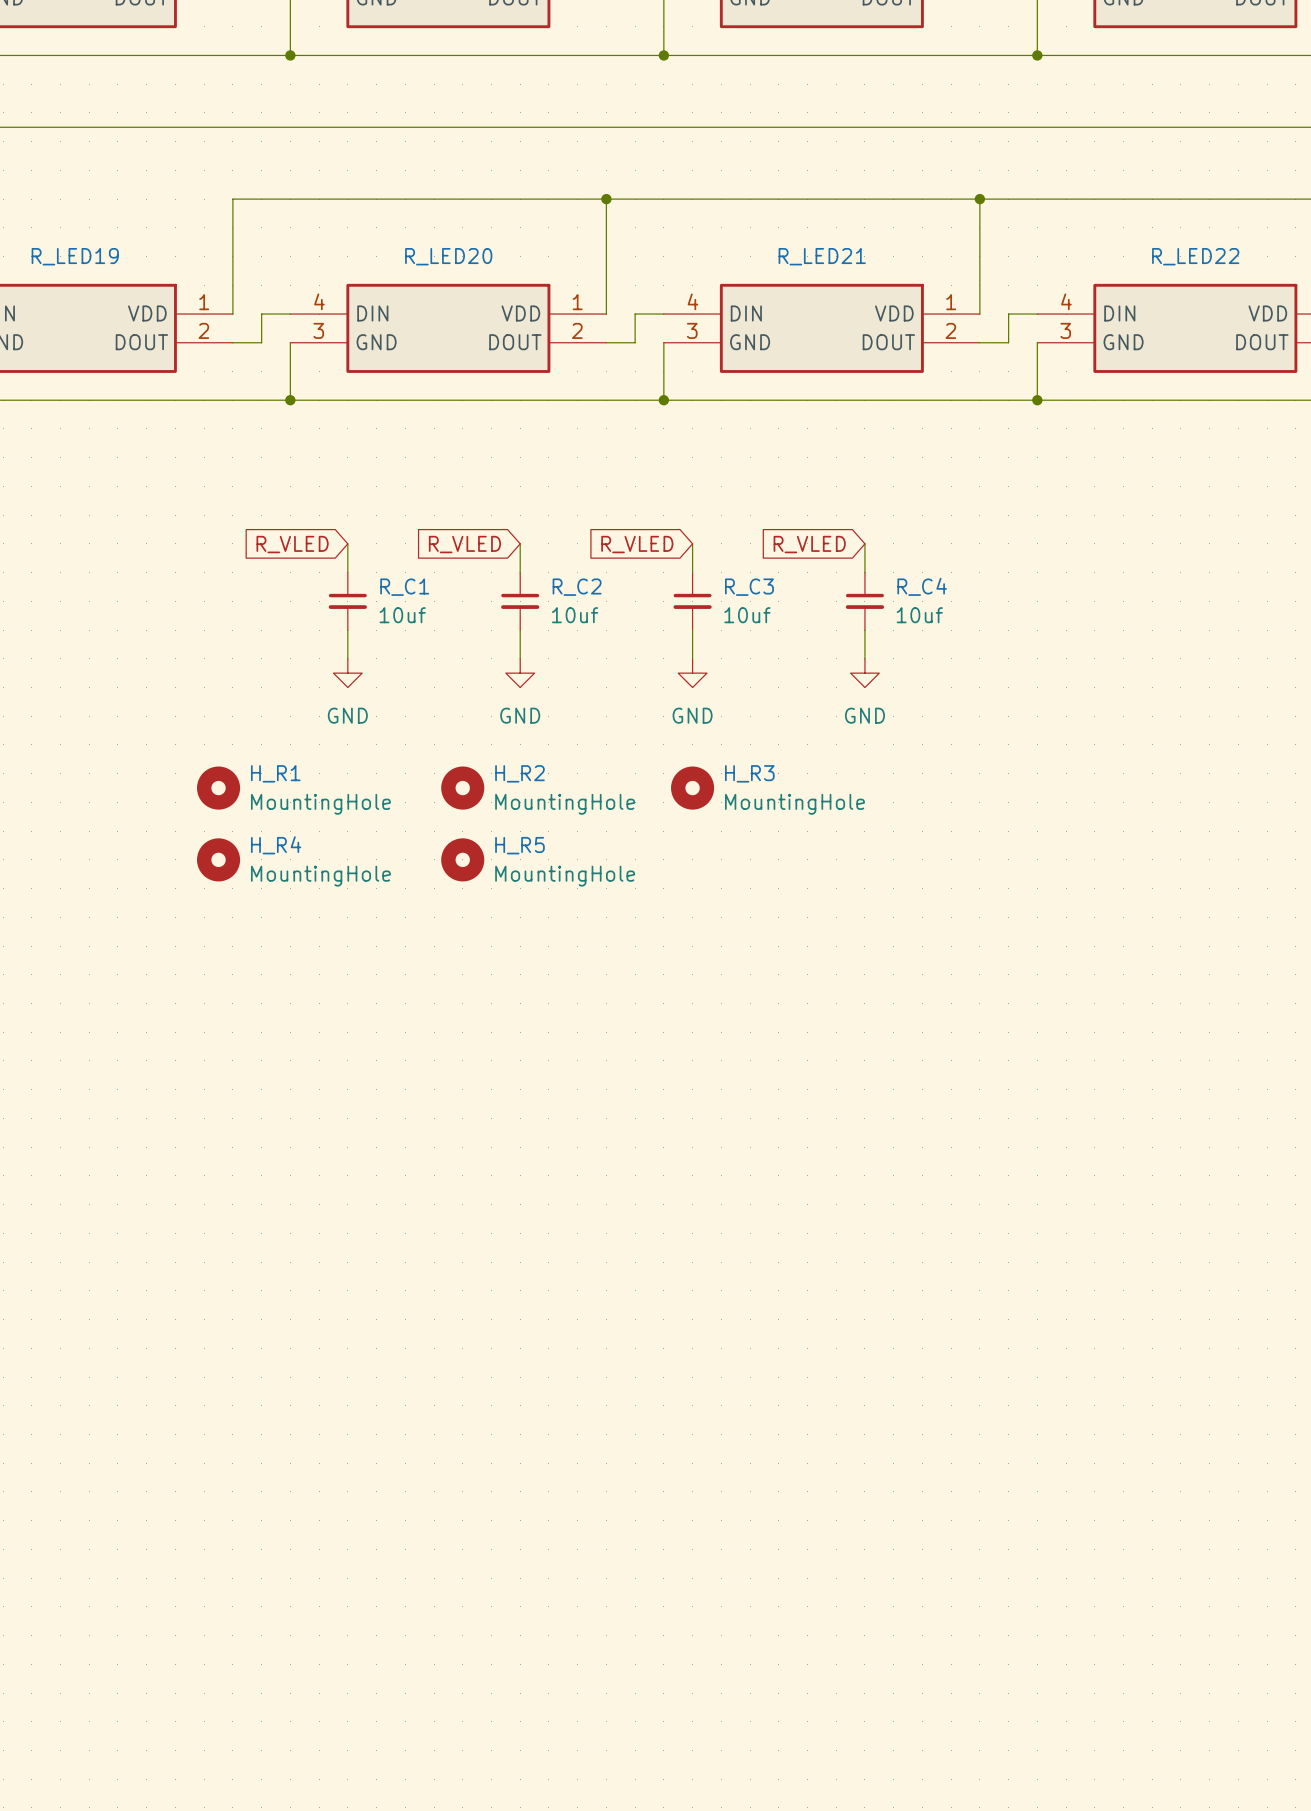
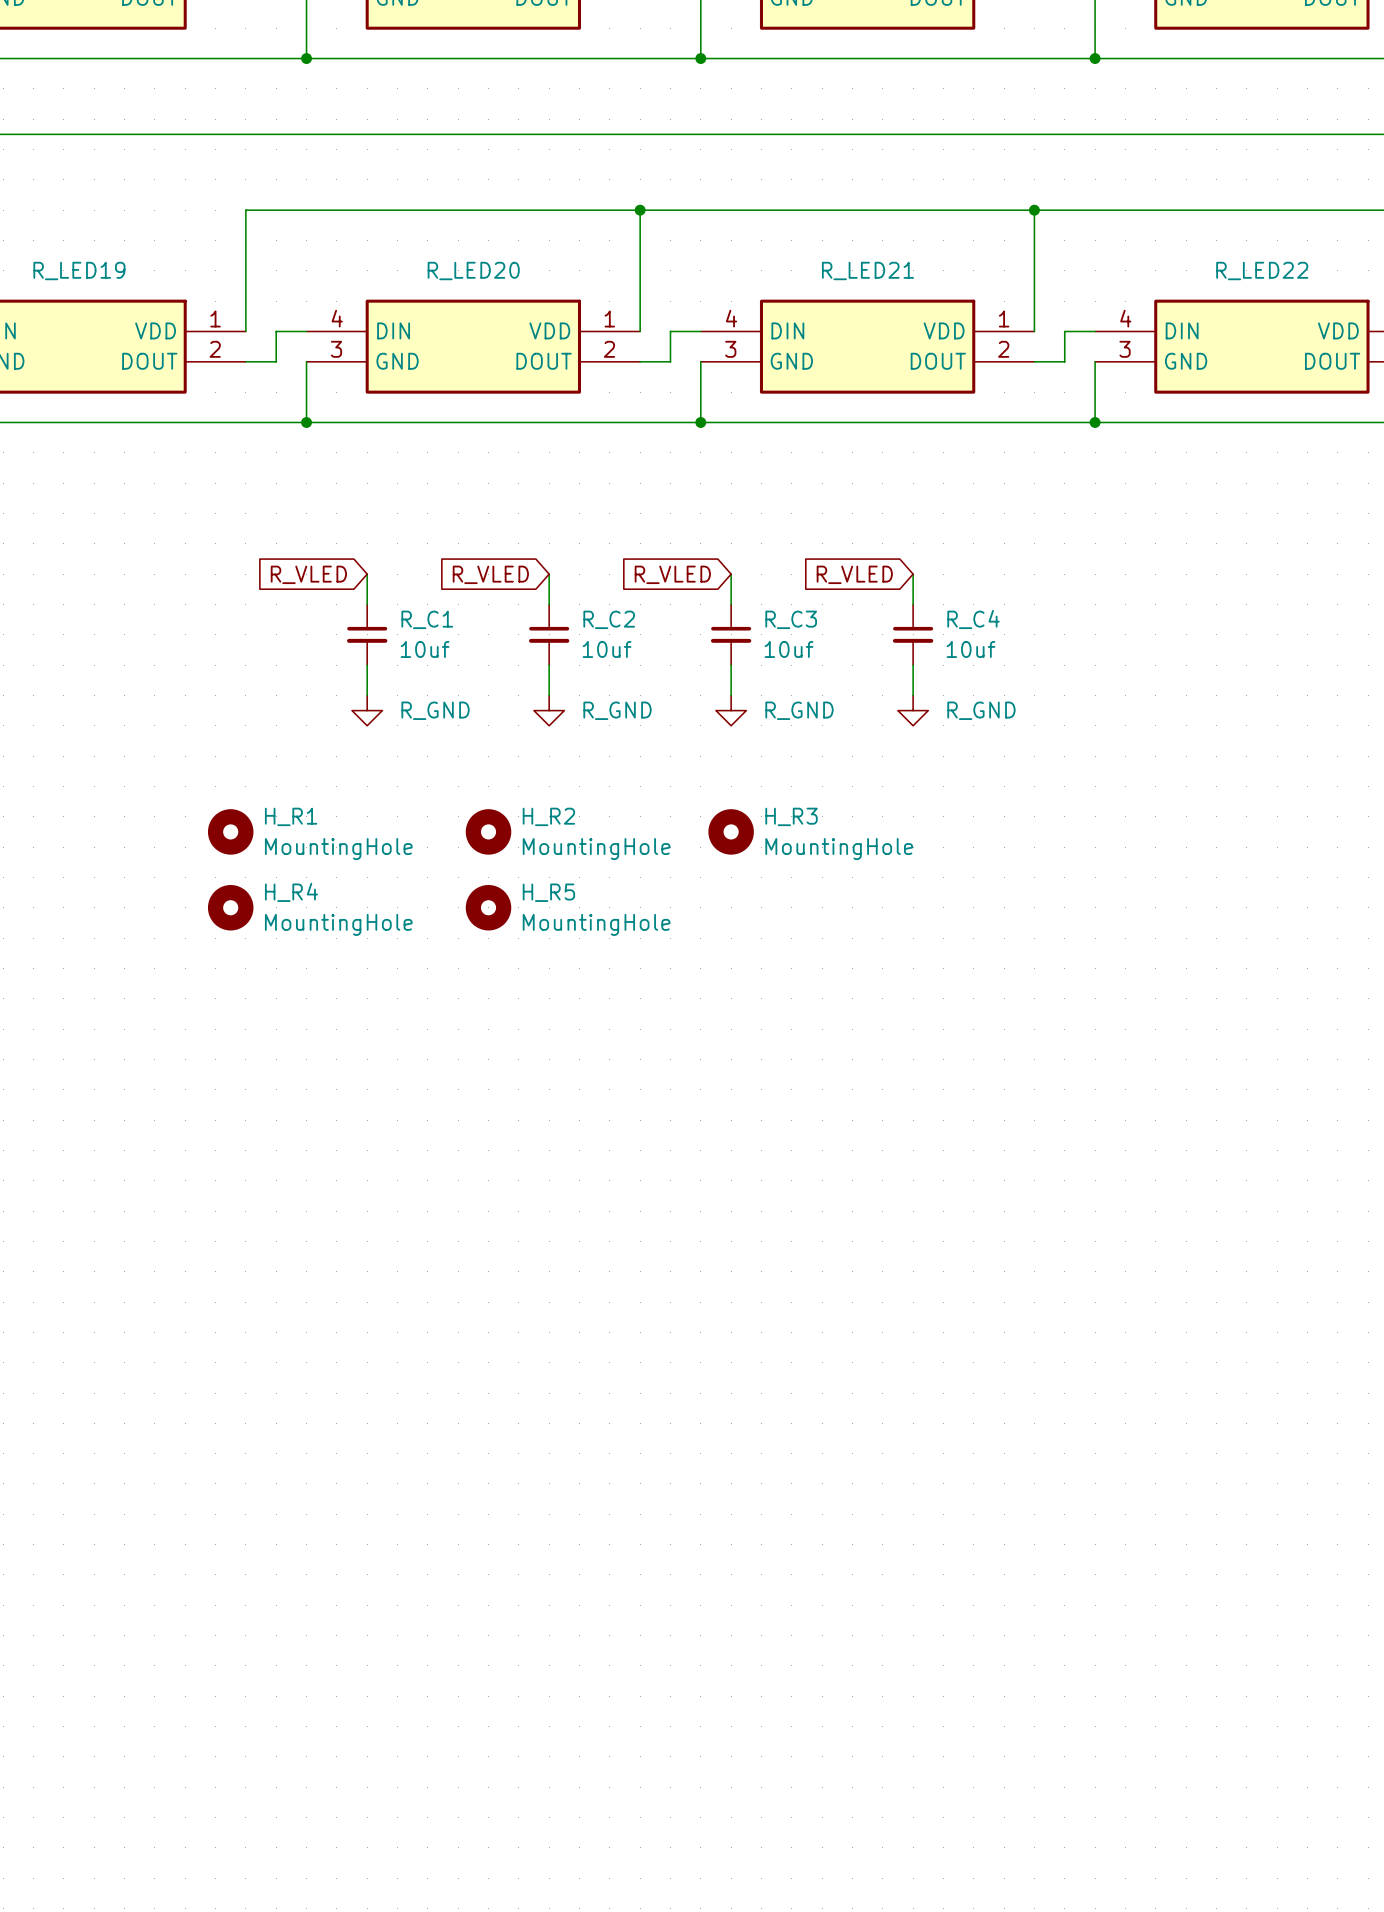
power symbol: GND (347, 673) -> R_GND (367, 710)
power symbol: GND (520, 673) -> R_GND (549, 710)
power symbol: GND (692, 673) -> R_GND (731, 710)
power symbol: GND (864, 673) -> R_GND (913, 710)

